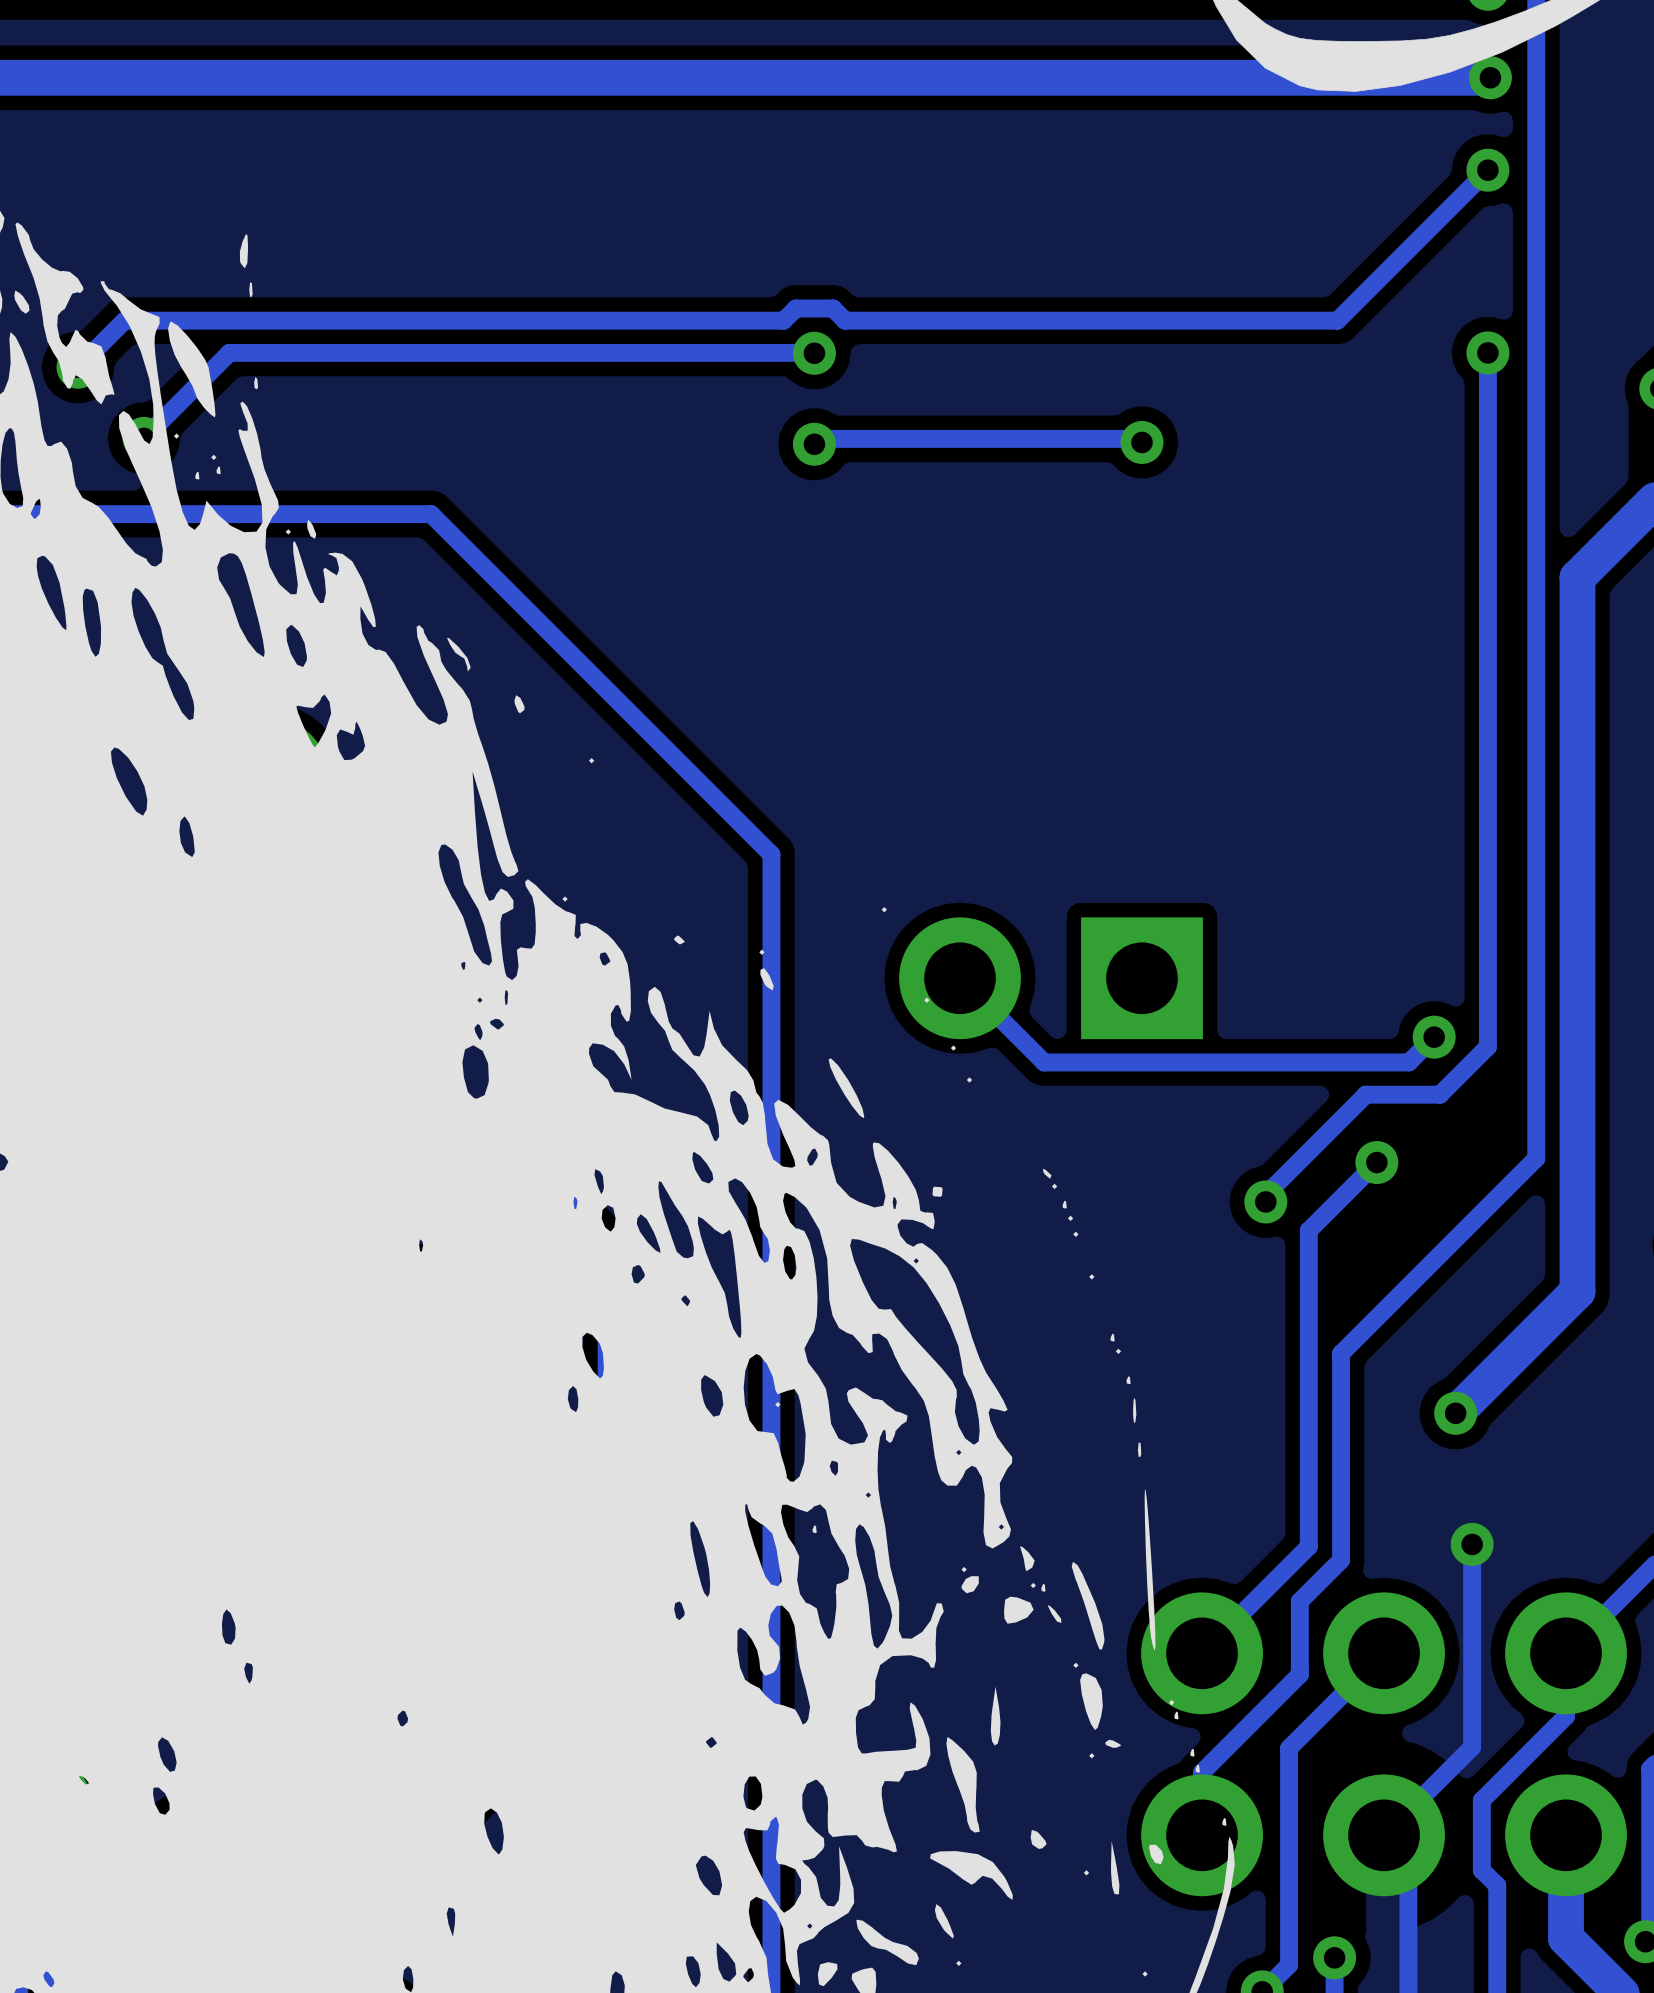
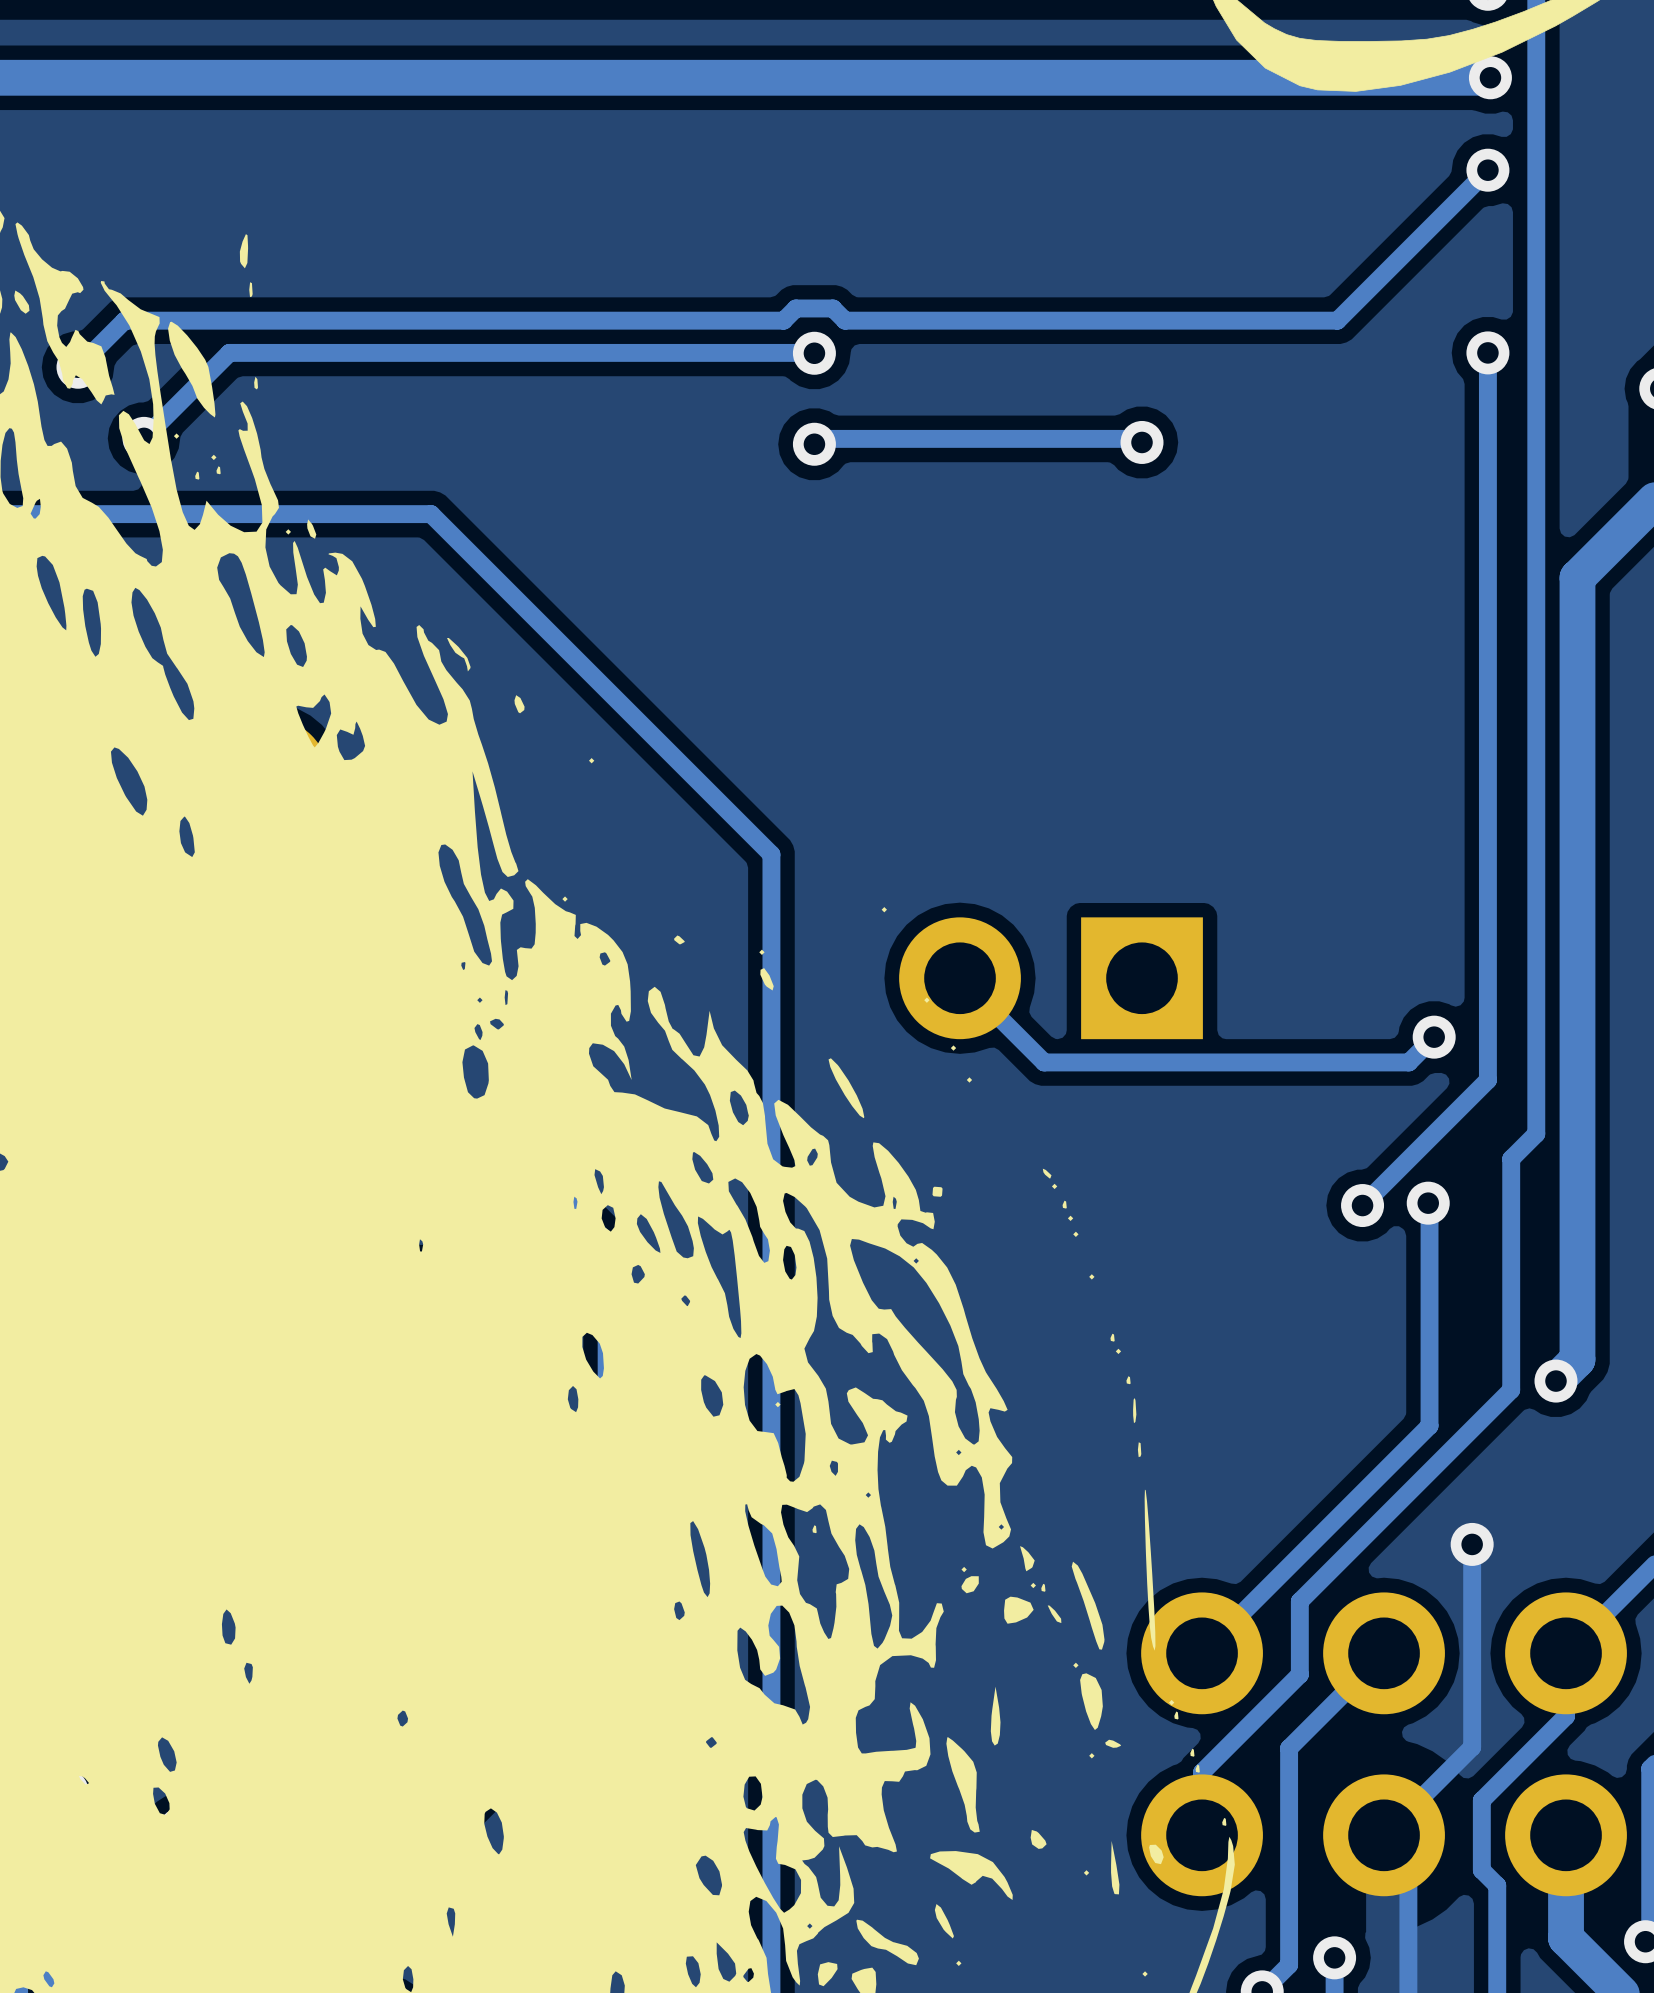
track: (1487, 1046) (1439, 1094) (1365, 1094) (1265, 1194) (1265, 1201) -> (1487, 1046) (1487, 1080) (1362, 1205)
track: (1536, 1133) (1536, 1158) (1341, 1353) (1341, 1560) -> (1536, 1133) (1511, 1158) (1511, 1390) (1341, 1560)
track: (1376, 1162) (1308, 1230) (1308, 1546) -> (1428, 1203) (1429, 1425) (1308, 1546)
via position: (1376, 1162) -> (1362, 1205)
via: (1265, 1201) -> none
via: none -> (1428, 1203)
track: (1577, 1291) (1455, 1413) -> (1577, 1291) (1577, 1359) (1555, 1381)
via: none -> (1555, 1381)
via: (1455, 1413) -> none

